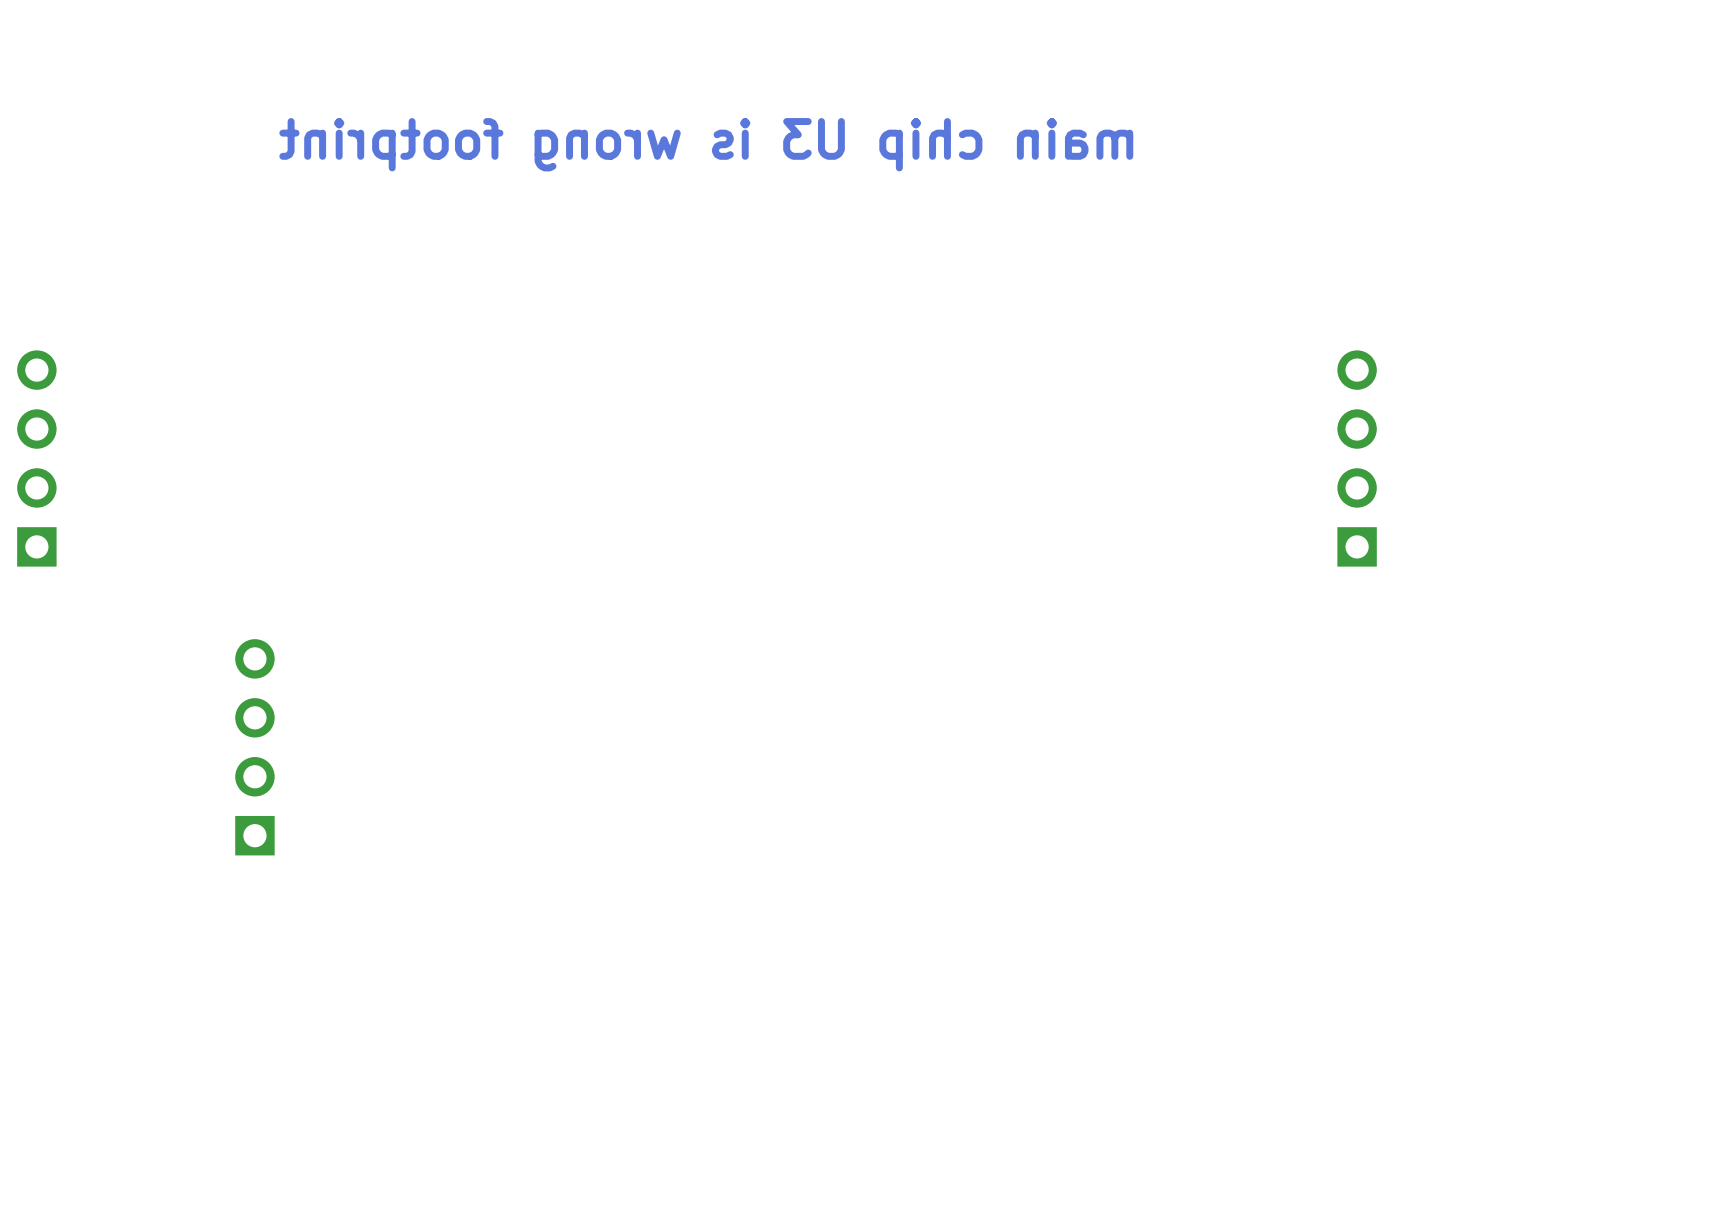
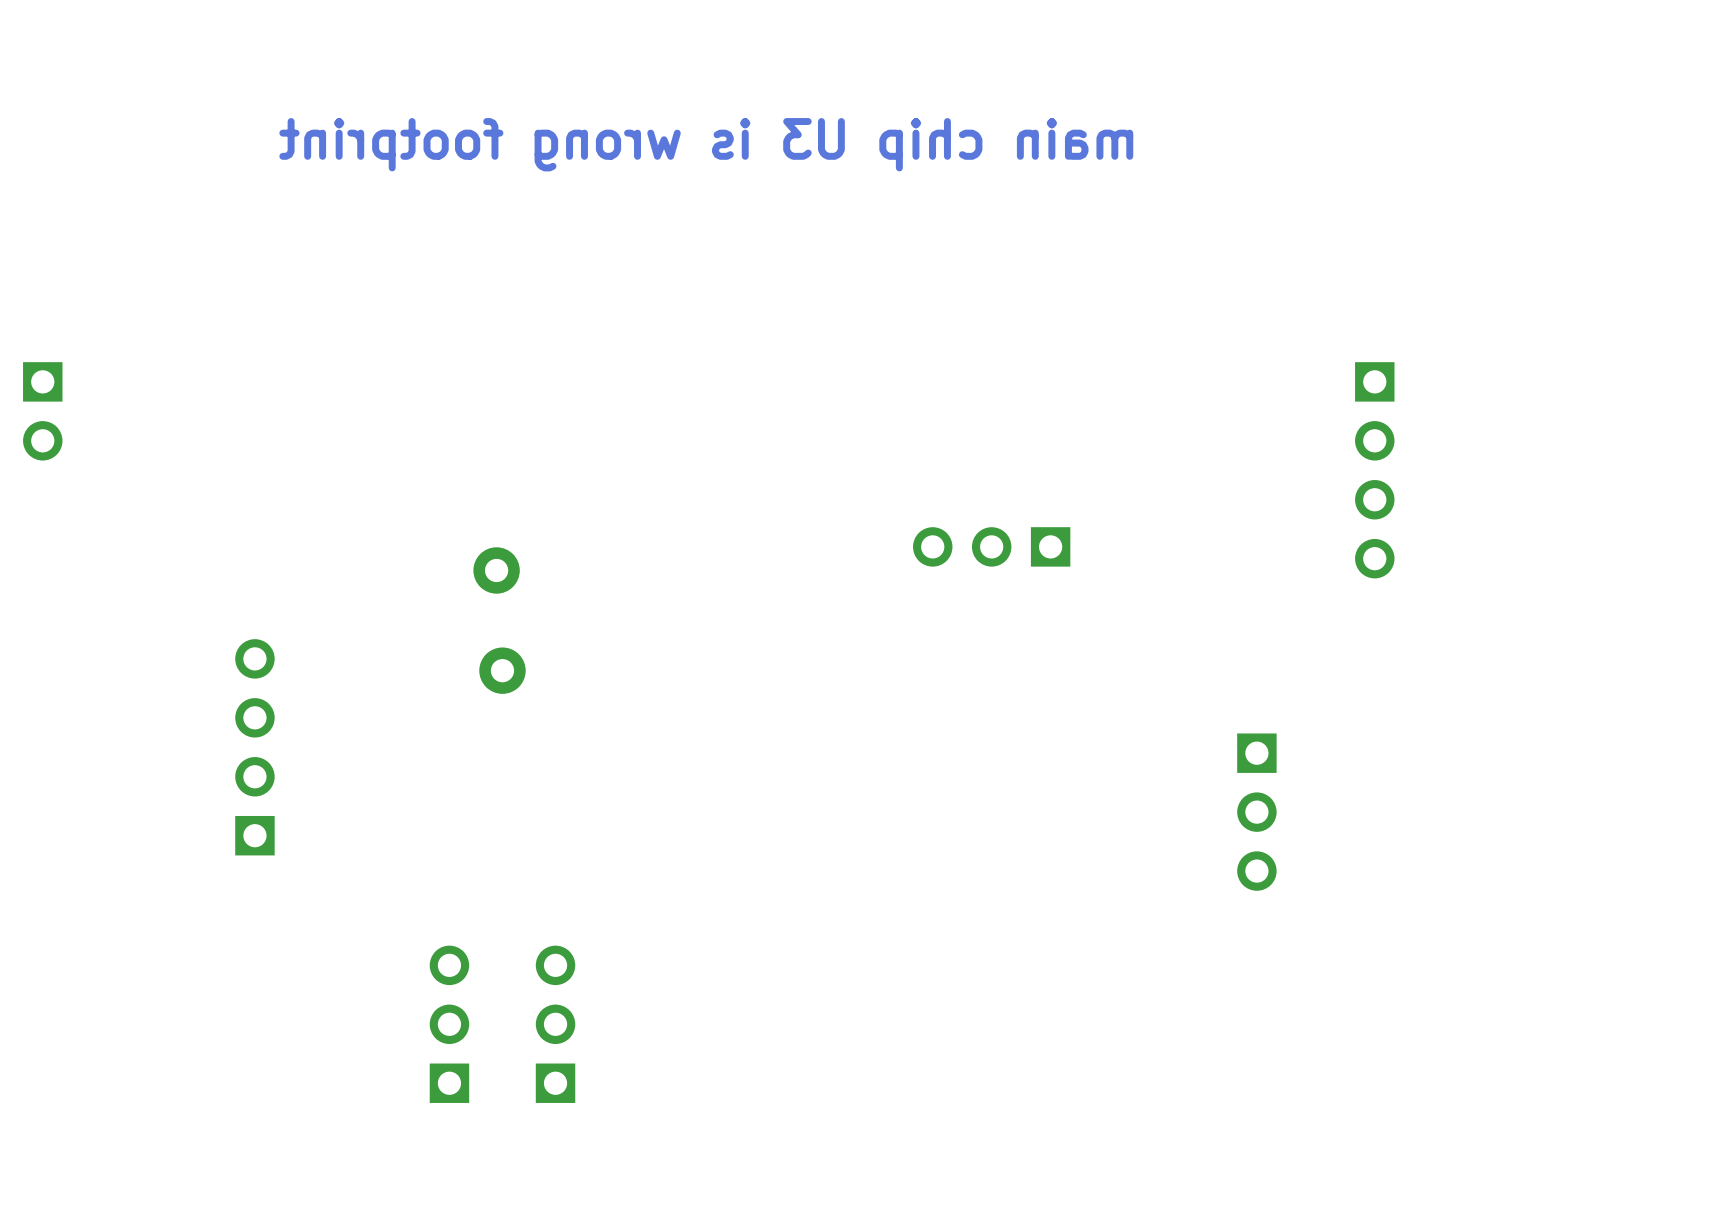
part: none -> (42, 411)
part: (36, 458) -> none
part rotation: 0° (1357, 458) -> 180° (1374, 470)
part: none -> (991, 546)
part: none -> (496, 570)
part: none -> (502, 670)
part: none -> (1256, 812)
part: none -> (449, 1024)
part: none -> (555, 1024)

